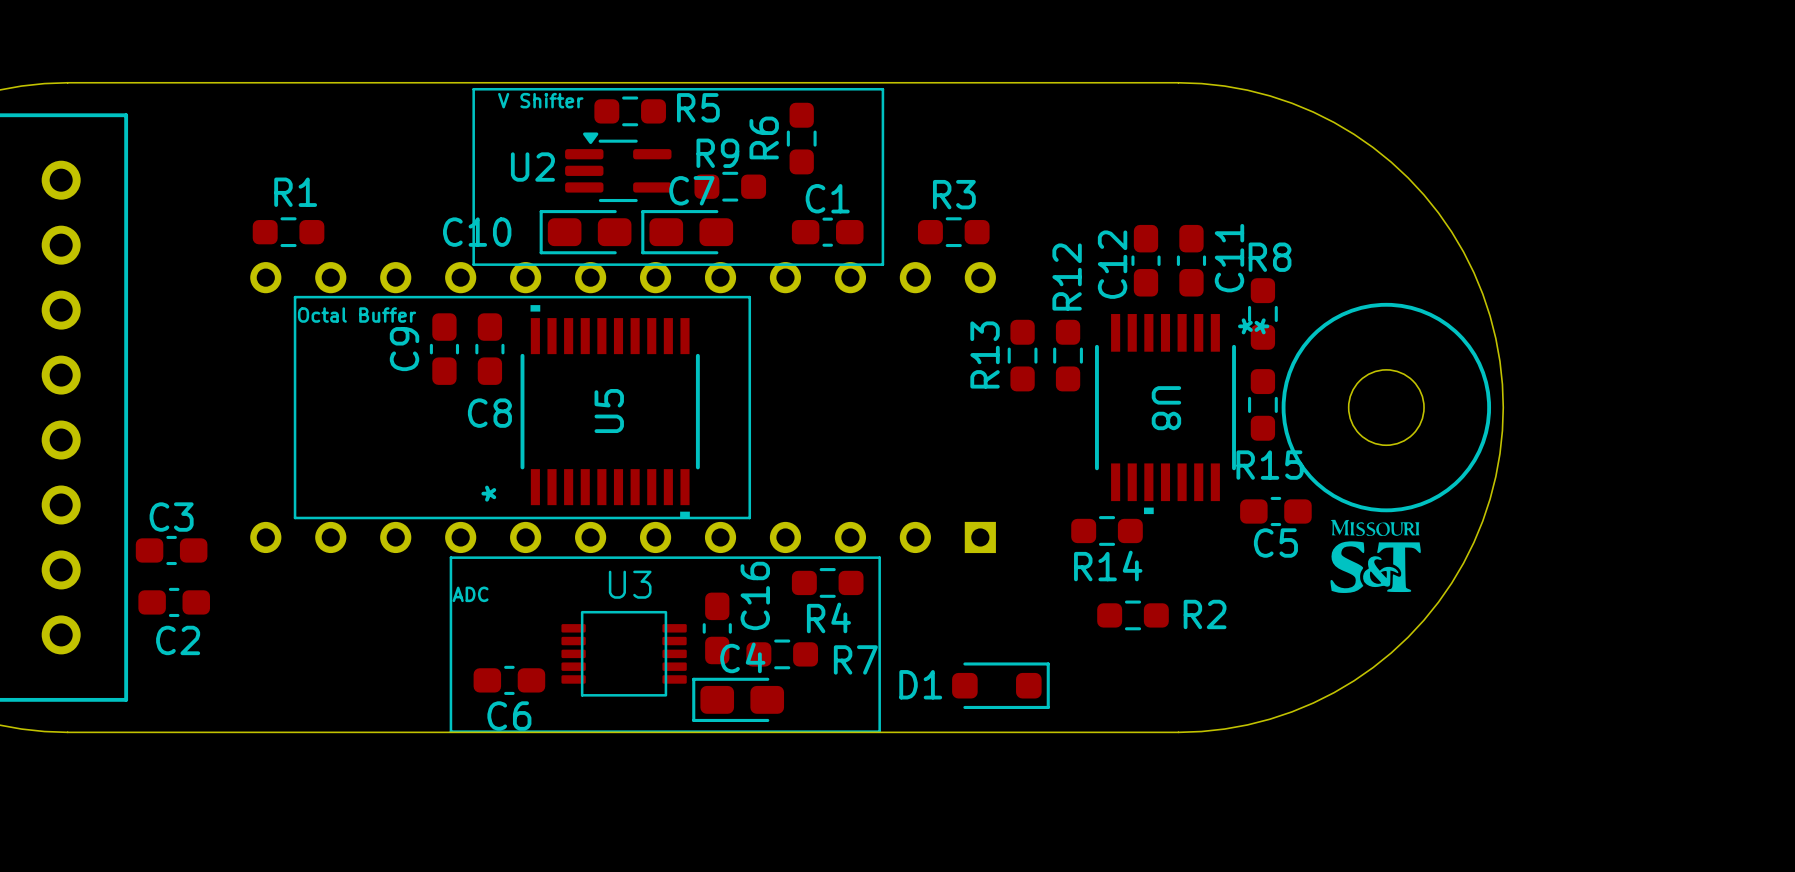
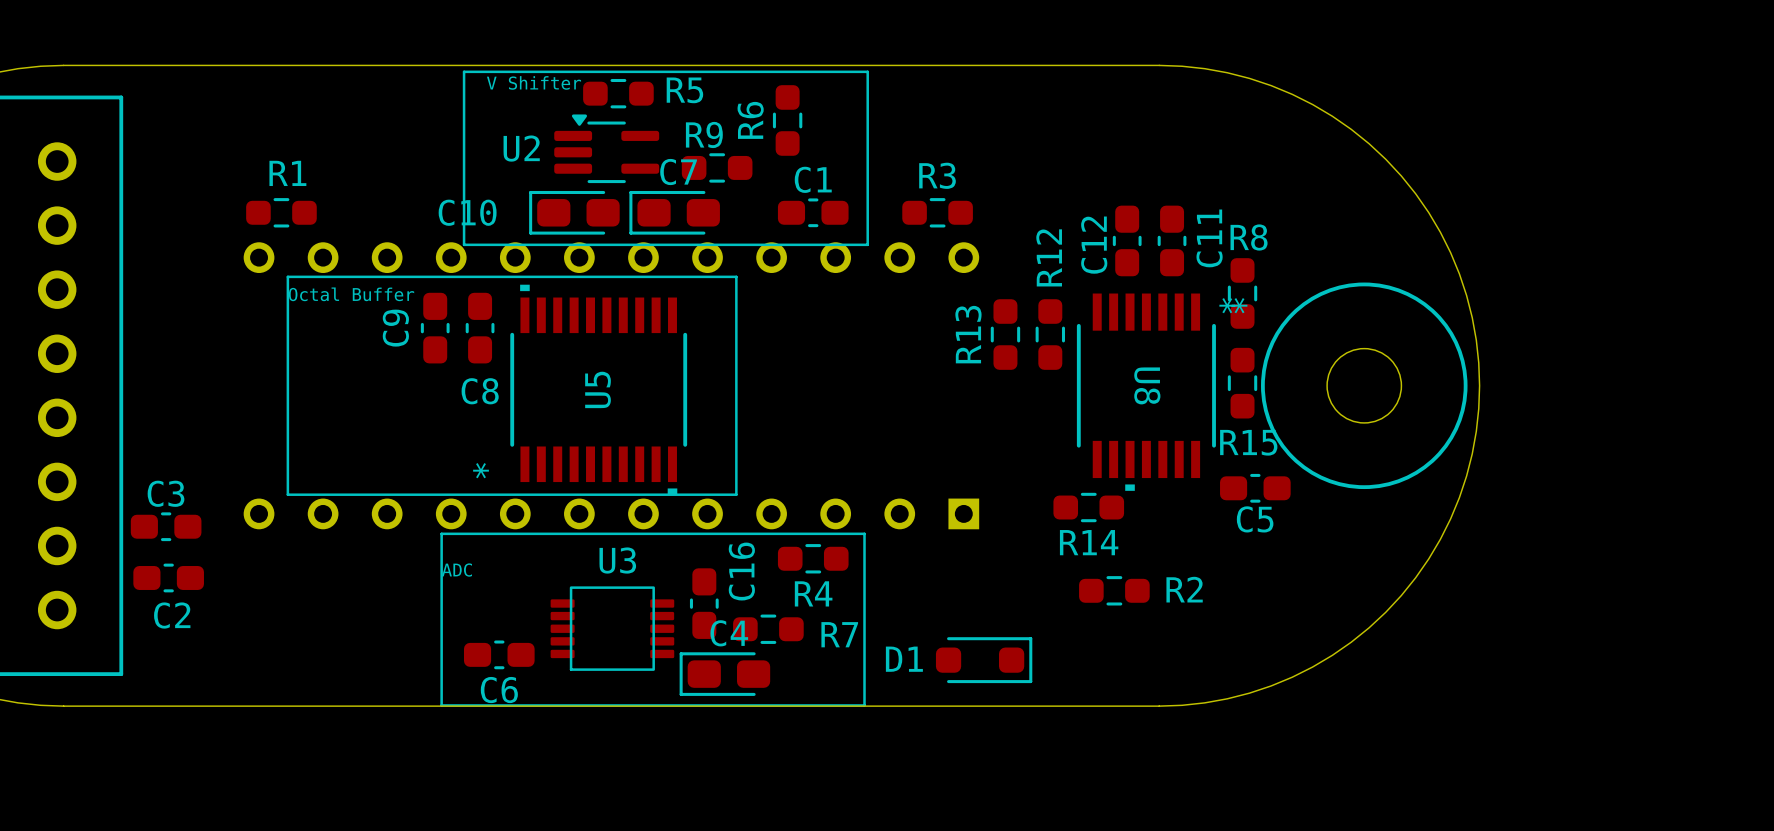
drawing: [1330, 519, 1421, 593] -> none

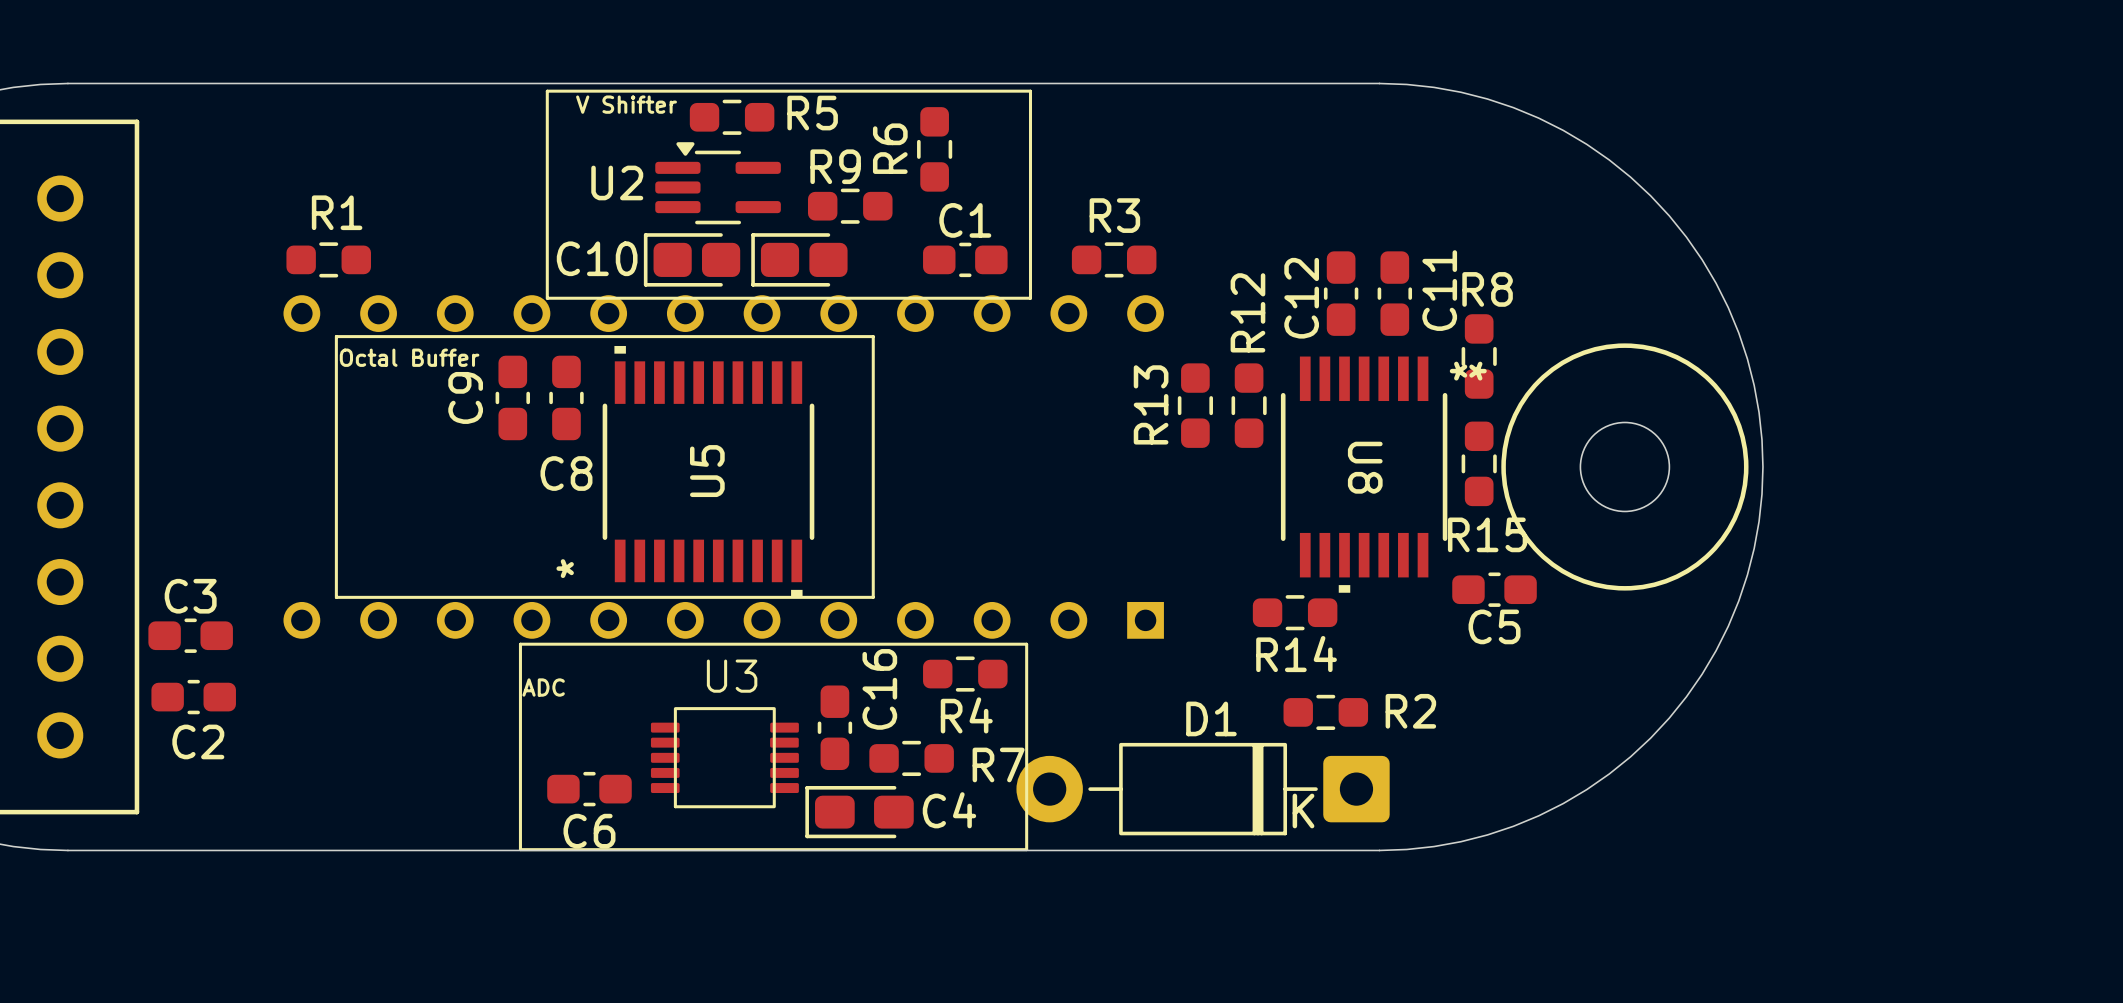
C10 footprint: [529, 190, 620, 235] -> [643, 233, 741, 287]
C10 name position: C10 (467, 212) -> C10 (597, 258)
C7: (674, 212) -> none
part: none -> (799, 259)
C4 name position: C4 (729, 633) -> C4 (949, 810)
D1 footprint: [935, 637, 1033, 684] -> [1016, 742, 1390, 836]
D1 name position: D1 (904, 659) -> D1 (1211, 718)

